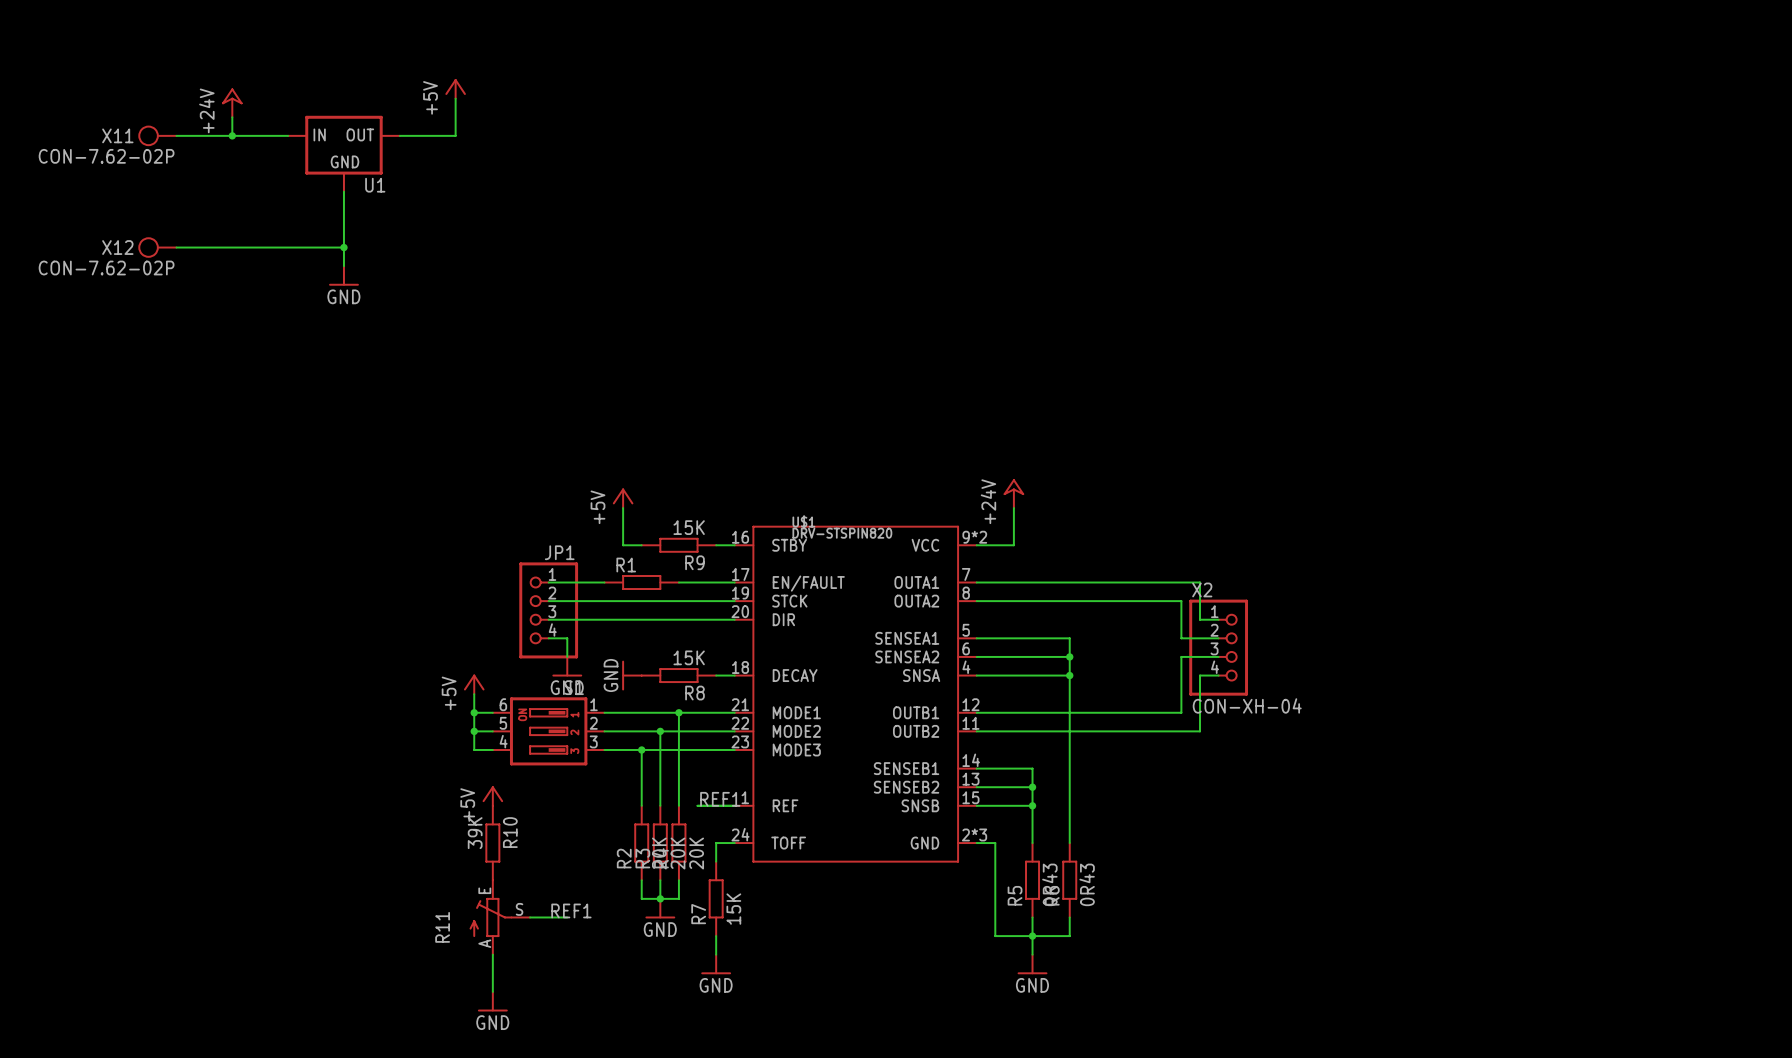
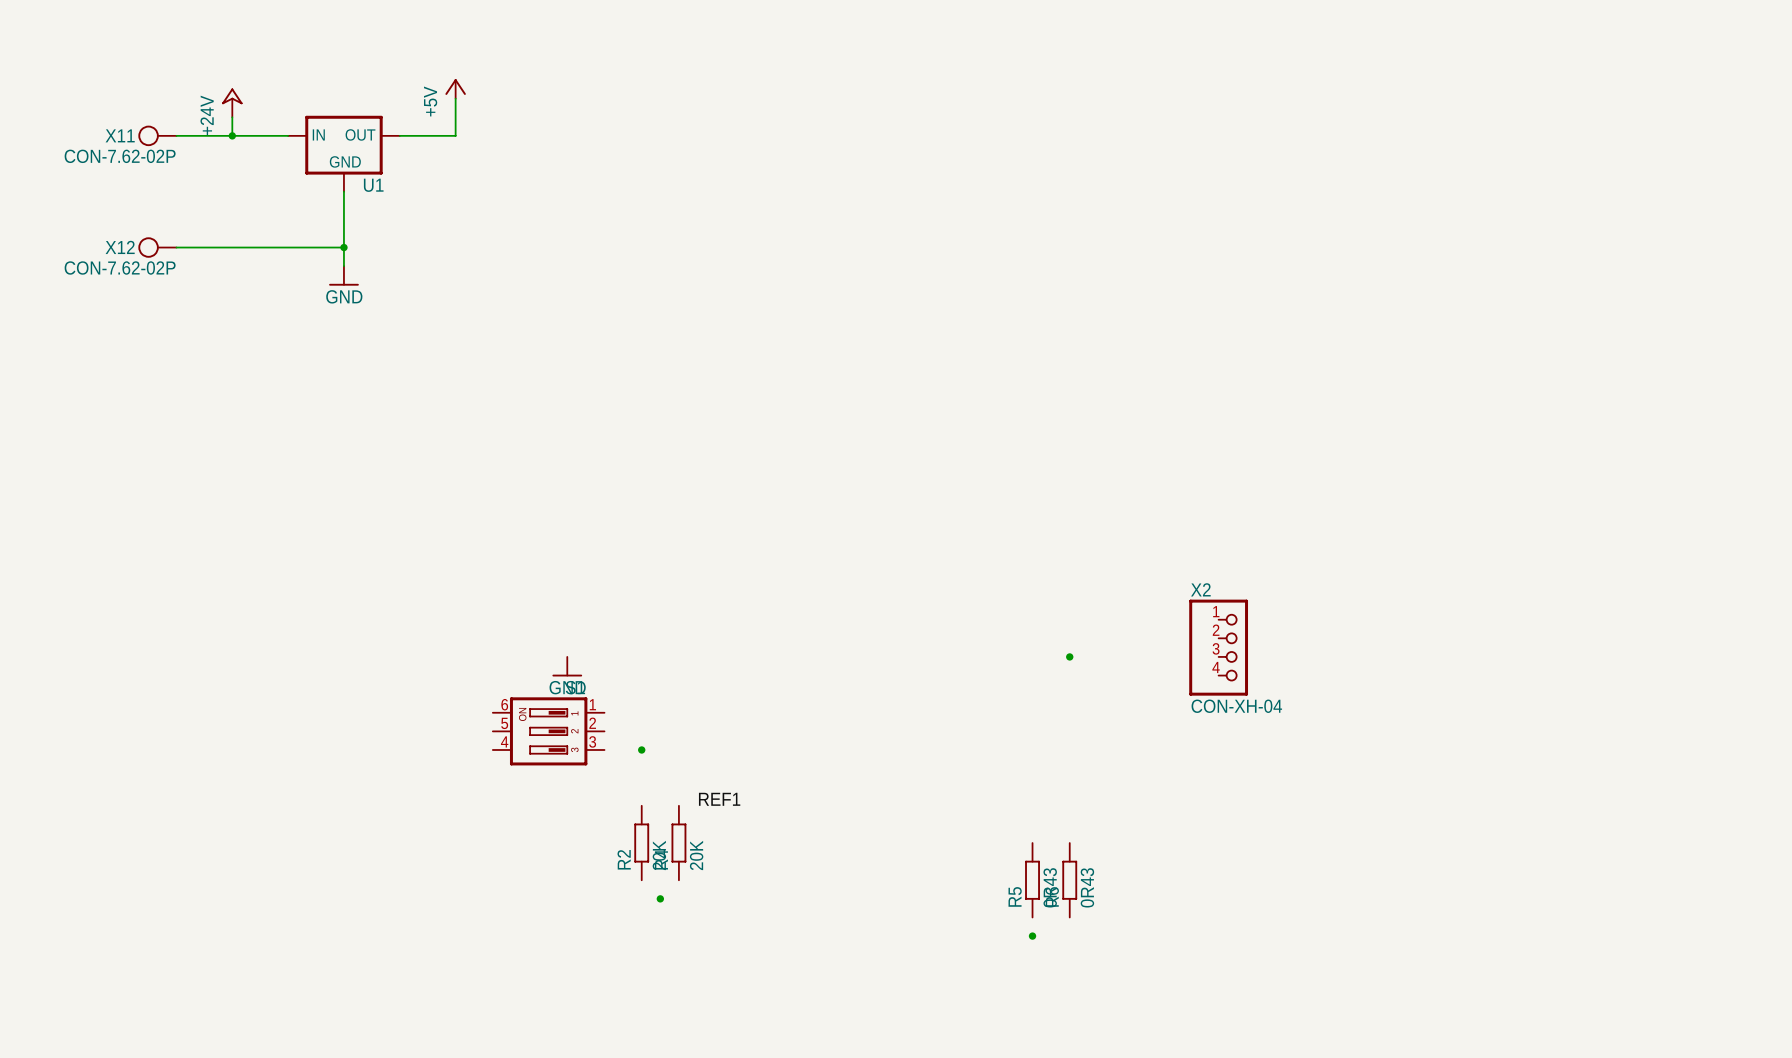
power symbol: +24V (1013, 493) -> none
power symbol: +5V (623, 498) -> none
wire: (623, 508) (623, 545) (641, 545) -> none
wire: (1013, 508) (1013, 545) (976, 545) -> none
R9: 15K (678, 545) -> none
wire: (716, 545) (734, 545) -> none
wire: (548, 582) (604, 582) -> none
R1: (641, 582) -> none
wire: (678, 582) (734, 582) -> none
wire: (976, 582) (1200, 582) (1200, 619) (1218, 619) -> none
wire: (548, 601) (734, 601) -> none
wire: (976, 601) (1181, 601) (1181, 638) (1218, 638) -> none
JP1: (548, 610) -> none
wire: (548, 619) (734, 619) -> none
wire: (548, 638) (567, 638) (567, 656) -> none
wire: (976, 638) (1069, 638) (1069, 843) -> none
wire: (976, 656) (1069, 656) -> none
wire: (1218, 656) (1181, 656) (1181, 712) (976, 712) -> none
power symbol: GND (631, 675) -> none
R8: 15K (678, 675) -> none
wire: (716, 675) (734, 675) -> none
wire: (976, 675) (1069, 675) -> none
junction: (1069, 675) -> none
wire: (1218, 675) (1200, 675) (1200, 731) (976, 731) -> none
power symbol: +5V (474, 684) -> none
wire: (474, 694) (474, 749) (492, 749) -> none
U$1: DRV-STSPIN820 (855, 694) -> none
wire: (474, 712) (492, 712) -> none
junction: (474, 712) -> none
wire: (604, 712) (734, 712) -> none
wire: (678, 712) (678, 805) -> none
junction: (678, 712) -> none
wire: (474, 731) (492, 731) -> none
junction: (474, 731) -> none
wire: (604, 731) (734, 731) -> none
wire: (660, 731) (660, 805) -> none
junction: (660, 731) -> none
wire: (604, 749) (734, 749) -> none
wire: (641, 749) (641, 805) -> none
wire: (976, 768) (1032, 768) (1032, 843) -> none
wire: (976, 787) (1032, 787) -> none
junction: (1032, 787) -> none
power symbol: +5V (492, 796) -> none
wire: (697, 805) (734, 805) -> none
wire: (976, 805) (1032, 805) -> none
junction: (1032, 805) -> none
R10: 39K (492, 843) -> none
R3: 20K (660, 843) -> none
wire: (734, 843) (716, 843) (716, 861) -> none
wire: (976, 843) (995, 843) (995, 936) (1069, 936) (1069, 917) -> none
wire: (641, 880) (641, 898) (678, 898) (678, 880) -> none
wire: (660, 880) (660, 898) -> none
R7: 15K (716, 898) -> none
power symbol: GND (660, 908) -> none
label: REF1 (571, 910) -> none
R11: (500, 917) -> none
wire: (530, 917) (567, 917) -> none
wire: (1032, 917) (1032, 954) -> none
wire: (716, 936) (716, 954) -> none
wire: (492, 954) (492, 991) -> none
power symbol: GND (716, 964) -> none
power symbol: GND (1032, 964) -> none
power symbol: GND (492, 1001) -> none

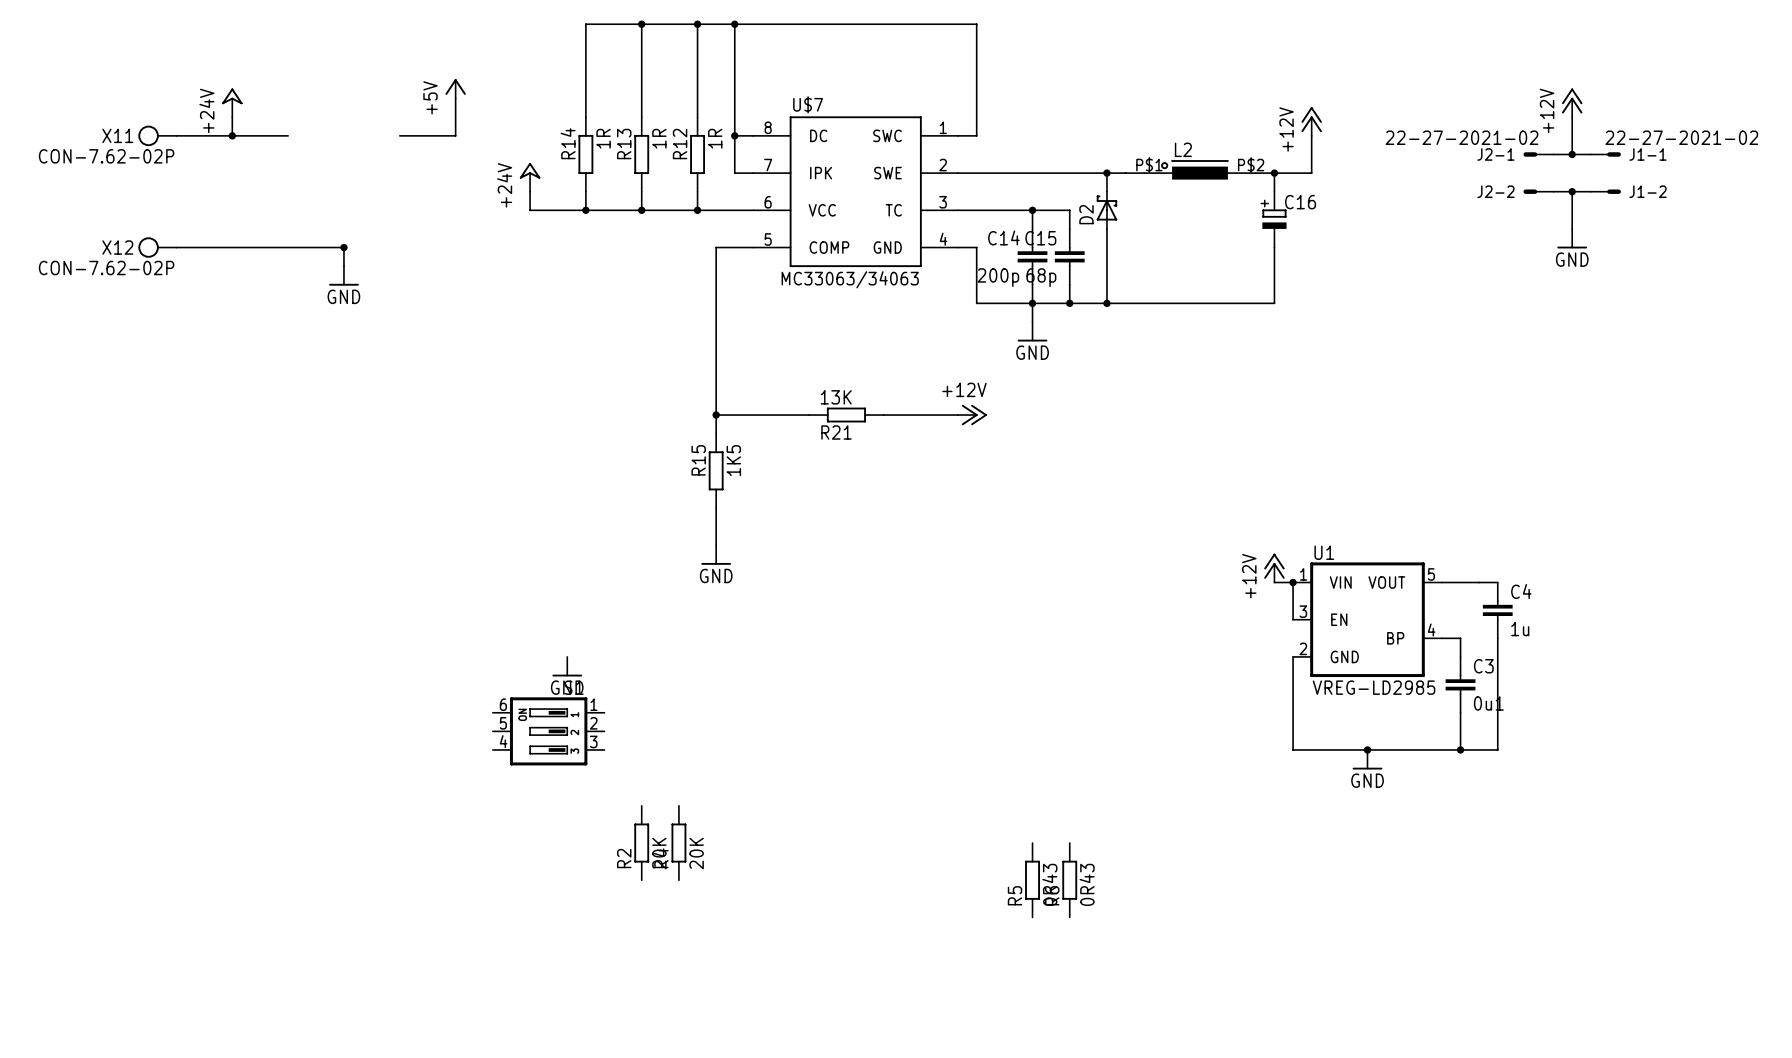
wire: none -> (641, 24) (641, 117)
junction: none -> (641, 24)
wire: none -> (697, 24) (697, 117)
junction: none -> (697, 24)
wire: none -> (734, 24) (734, 173) (753, 173)
junction: none -> (734, 24)
power symbol: none -> +12V (1572, 102)
U1 symbol: [288, 115, 400, 192] -> [1293, 562, 1442, 678]
wire: none -> (585, 117) (585, 24) (976, 24) (976, 135) (958, 135)
wire: none -> (1572, 117) (1572, 154)
power symbol: none -> +12V (1311, 121)
wire: none -> (734, 135) (753, 135)
junction: none -> (734, 135)
wire: none -> (1311, 135) (1311, 173) (1255, 173)
R14: none -> 1R (585, 154)
R13: none -> 1R (641, 154)
R12: none -> 1R (697, 154)
J2-1: none -> 22-27-2021-02 (1538, 154)
wire: none -> (1553, 154) (1590, 154)
junction: none -> (1572, 154)
J1-1: none -> 22-27-2021-02 (1605, 154)
L2: none -> (1200, 169)
wire: none -> (958, 173) (1144, 173)
wire: none -> (1106, 173) (1106, 191)
junction: none -> (1106, 173)
wire: none -> (1274, 173) (1274, 191)
junction: none -> (1274, 173)
power symbol: none -> +24V (530, 177)
U1 name position: U1 (373, 185) -> U1 (1324, 552)
wire: (343, 191) (343, 247) -> none
wire: none -> (530, 191) (530, 210) (753, 210)
wire: none -> (585, 191) (585, 210)
wire: none -> (641, 191) (641, 210)
wire: none -> (697, 191) (697, 210)
U$7: none -> (855, 191)
J2-2: none -> (1538, 191)
wire: none -> (1553, 191) (1590, 191)
wire: none -> (1572, 191) (1572, 228)
junction: none -> (1572, 191)
J1-2: none -> (1605, 191)
junction: none -> (585, 210)
junction: none -> (641, 210)
junction: none -> (697, 210)
wire: none -> (958, 210) (1069, 210) (1069, 228)
wire: none -> (1032, 210) (1032, 228)
junction: none -> (1032, 210)
D2: none -> (1106, 210)
C16: none -> (1274, 219)
wire: none -> (1106, 228) (1106, 303)
power symbol: none -> GND (1572, 238)
wire: none -> (753, 247) (716, 247) (716, 433)
wire: none -> (958, 247) (976, 247) (976, 303) (1274, 303) (1274, 247)
C14: none -> 200p (1032, 256)
C15: none -> 68p (1069, 256)
wire: none -> (1032, 284) (1032, 321)
wire: none -> (1069, 284) (1069, 303)
junction: none -> (1032, 303)
junction: none -> (1069, 303)
junction: none -> (1106, 303)
power symbol: none -> GND (1032, 331)
wire: none -> (716, 415) (809, 415)
junction: none -> (716, 415)
R21: none -> 13K (846, 415)
wire: none -> (883, 415) (958, 415)
power symbol: none -> +12V (972, 415)
R15: none -> 1K5 (716, 470)
wire: none -> (716, 508) (716, 545)
power symbol: none -> GND (716, 555)
power symbol: none -> +12V (1274, 568)
wire: none -> (1274, 582) (1293, 582) (1293, 619)
junction: none -> (1293, 582)
wire: none -> (1441, 582) (1497, 582)
C4: none -> 1u (1497, 610)
wire: none -> (1441, 638) (1460, 638) (1460, 656)
wire: none -> (1497, 638) (1497, 749) (1293, 749) (1293, 656)
X2: CON-XH-04 (1218, 647) -> none
junction: (1069, 656) -> none
C3: none -> 0u1 (1460, 684)
U1 value: none -> VREG-LD2985 (1374, 687)
wire: none -> (1460, 712) (1460, 749)
junction: (641, 749) -> none
junction: none -> (1367, 749)
junction: none -> (1460, 749)
power symbol: none -> GND (1367, 759)
label: REF1 (719, 799) -> none
junction: (660, 898) -> none
junction: (1032, 936) -> none

